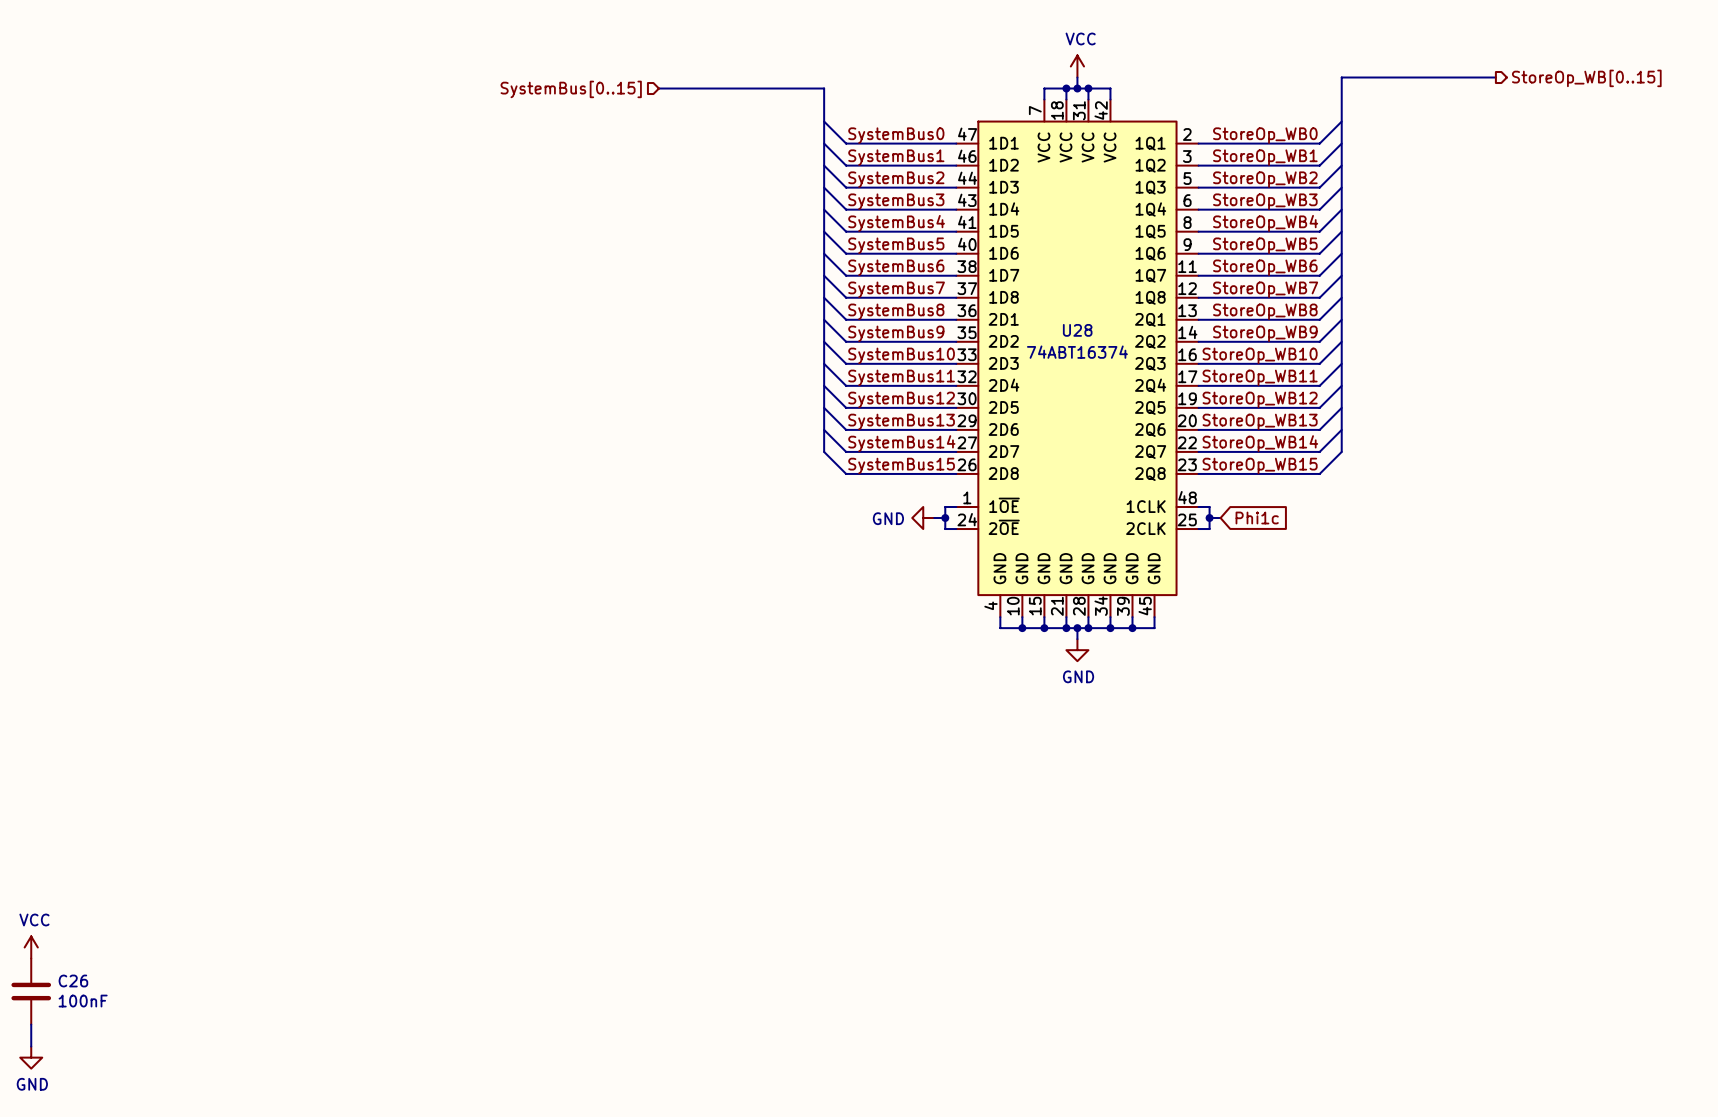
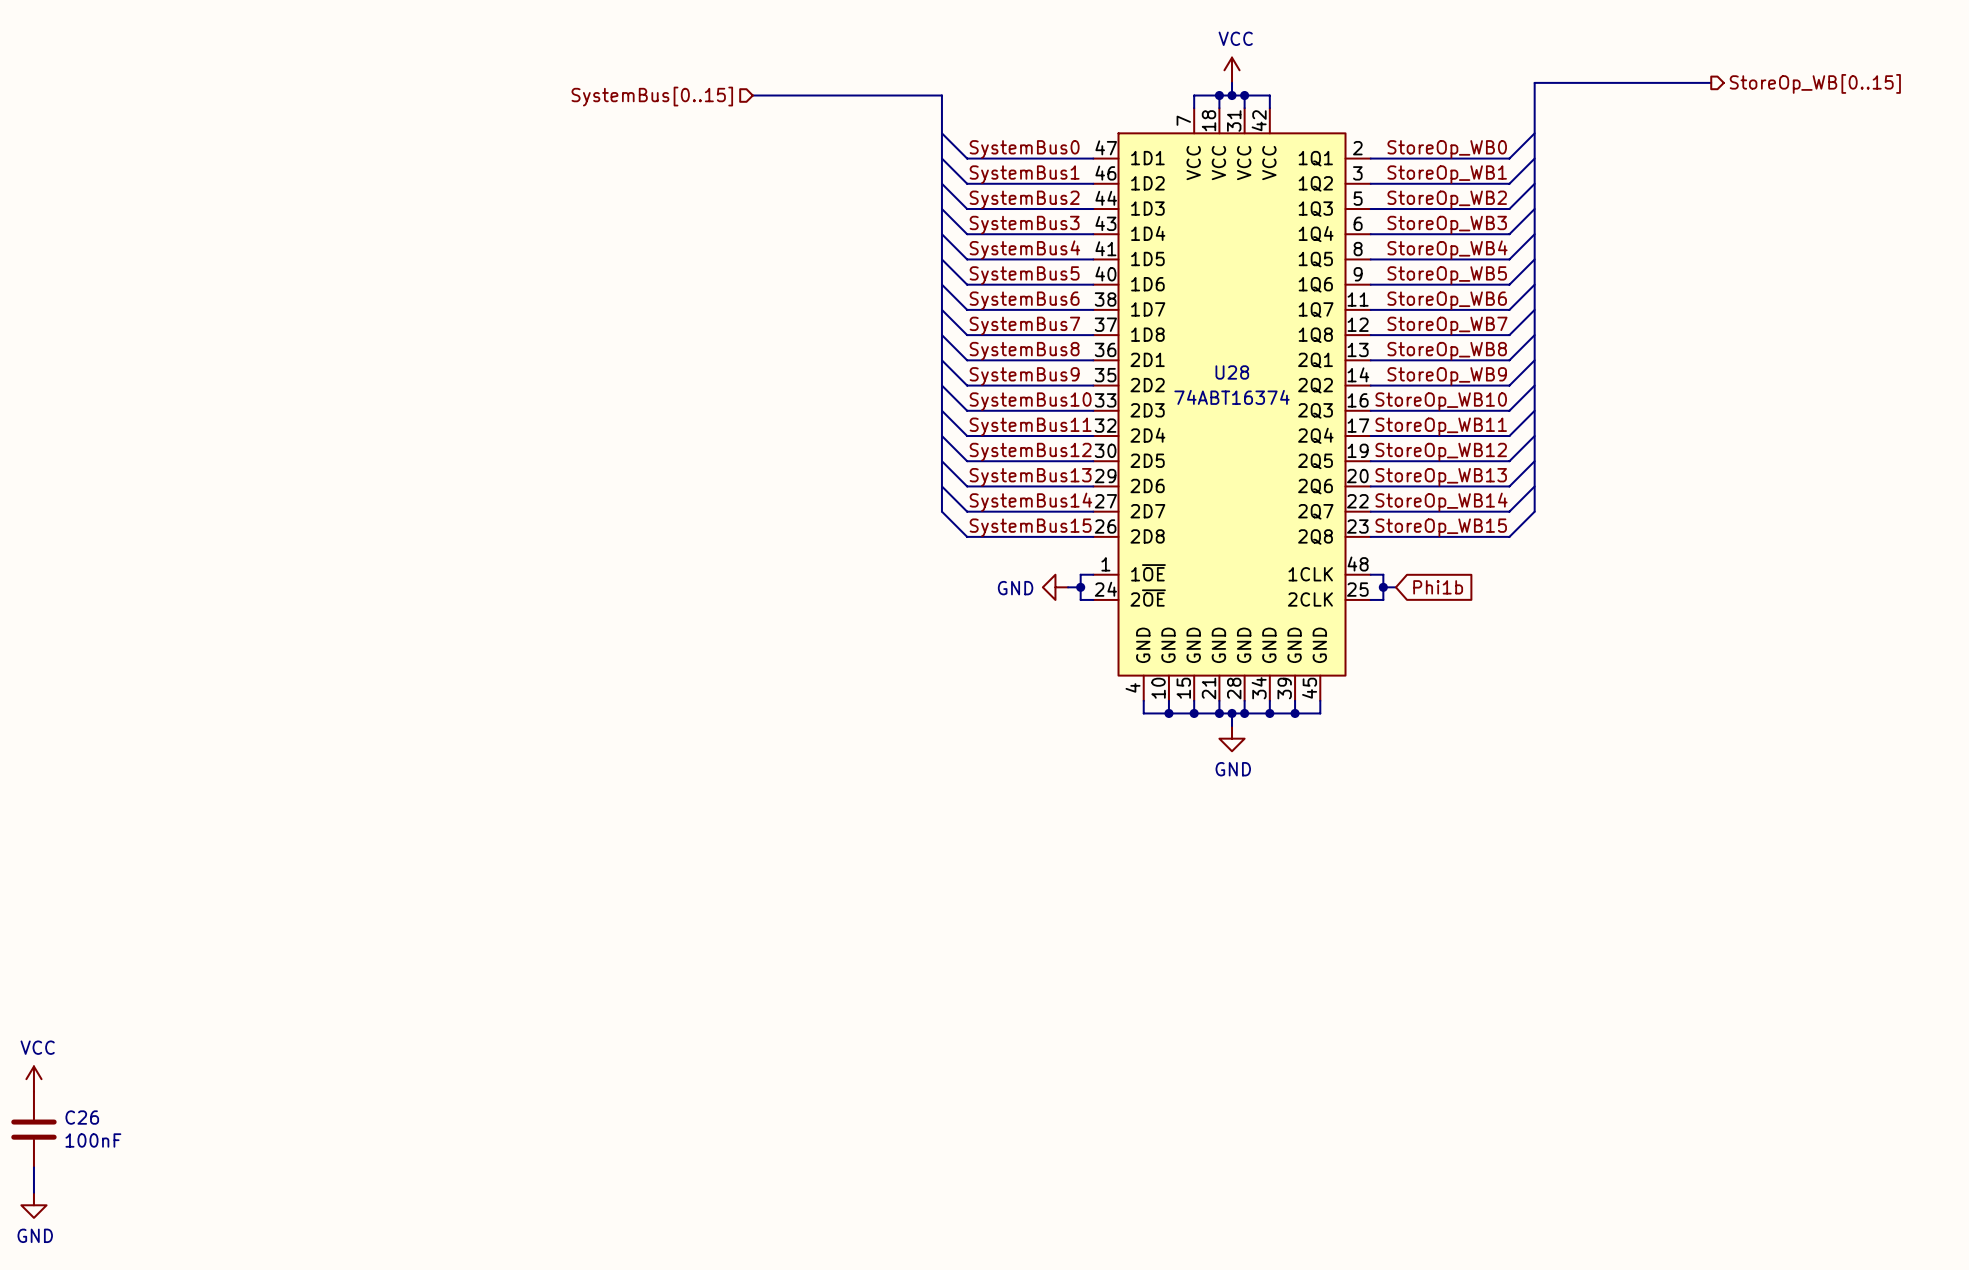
global label: Phi1c (1257, 518) -> Phi1b (1438, 587)

